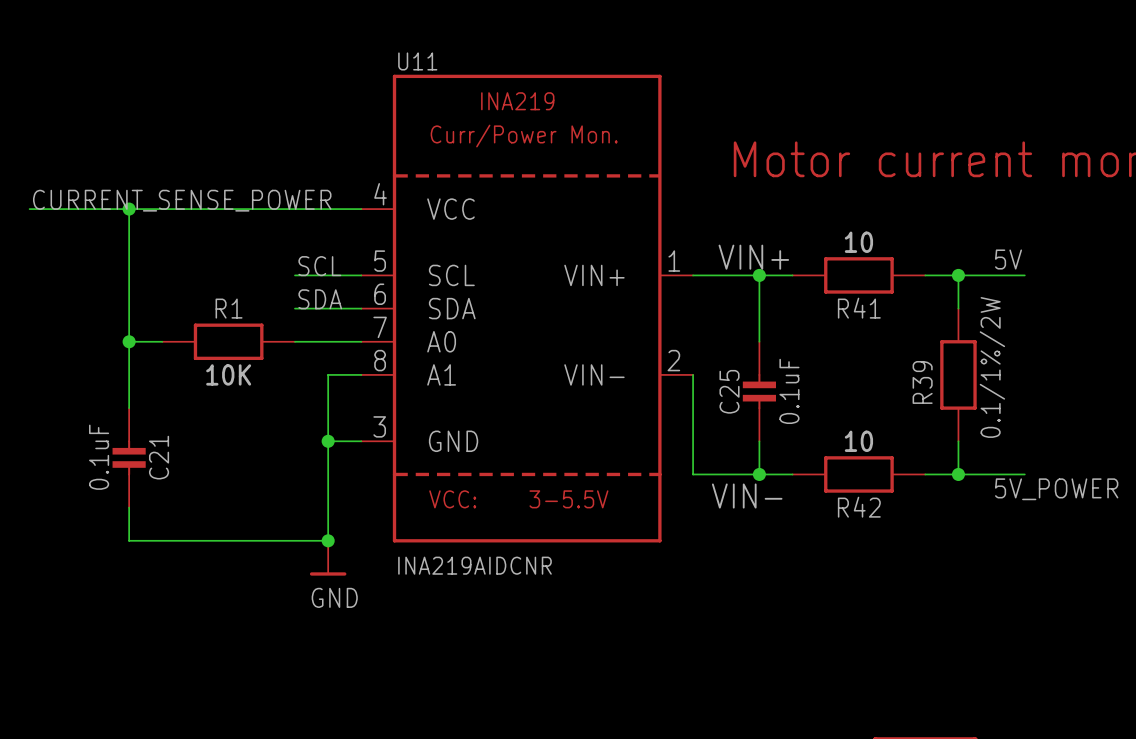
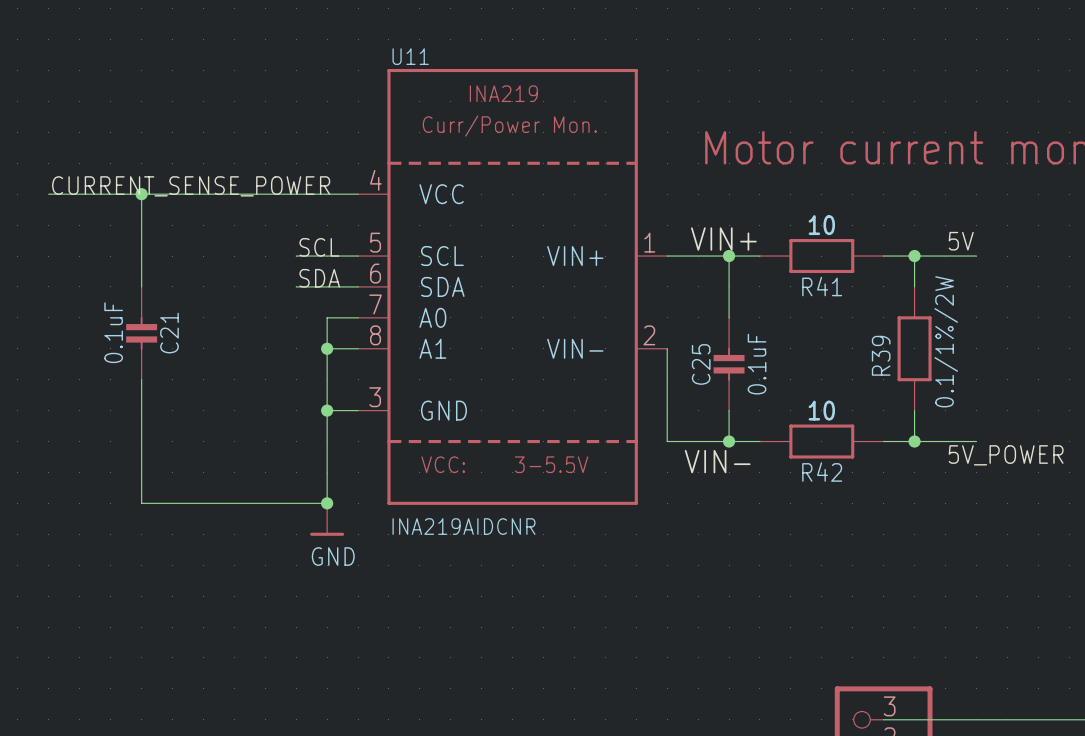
wire: (129, 341) (162, 341) -> none
junction: (129, 341) -> none
R1: 10K (228, 341) -> none
wire: (294, 341) (328, 341) -> (327, 348) (327, 317)
junction: none -> (327, 348)
C21 position: (129, 457) -> (141, 333)

